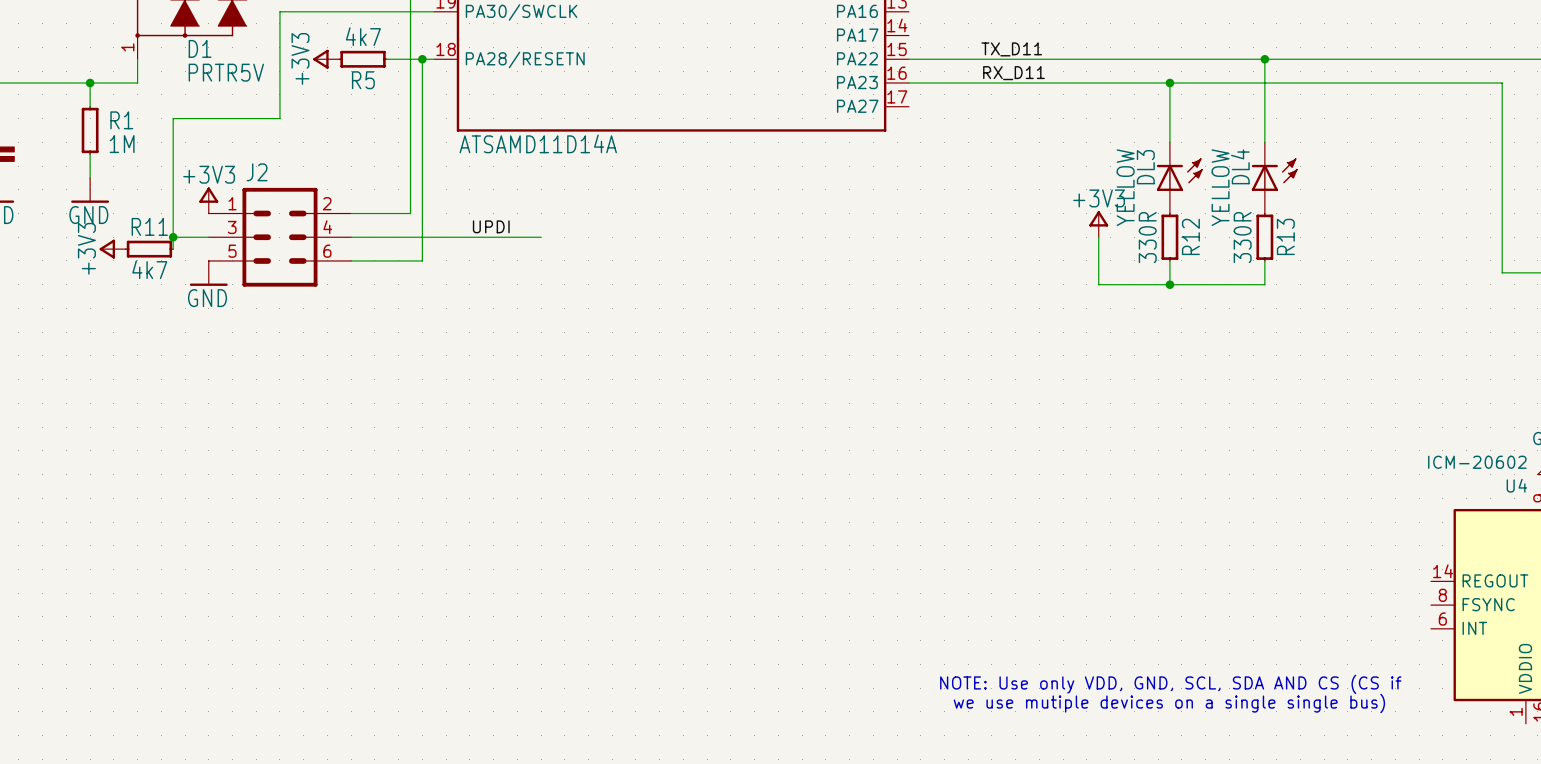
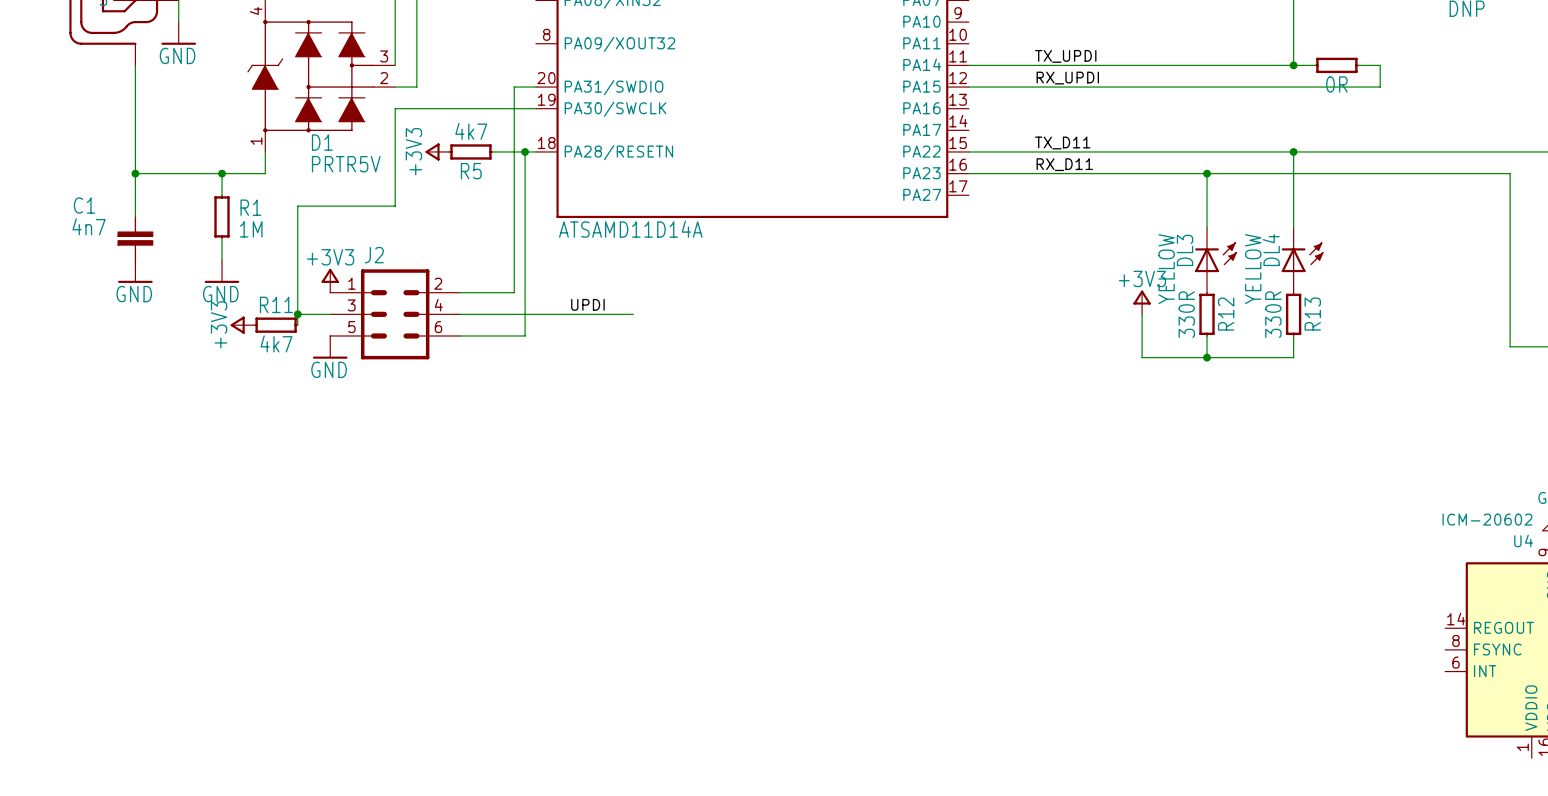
text: NOTE: Use only VDD, GND, SCL, SDA AND CS (CS if (1170, 684) -> none
text: we use mutiple devices on a single single bus) (1169, 703) -> none

